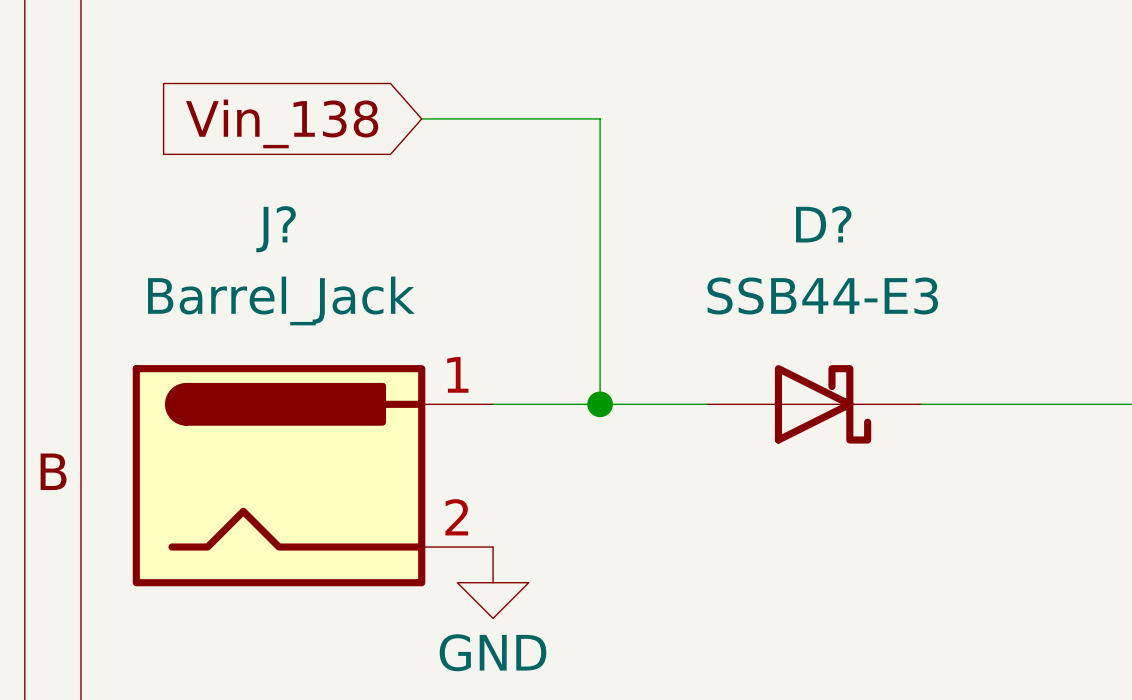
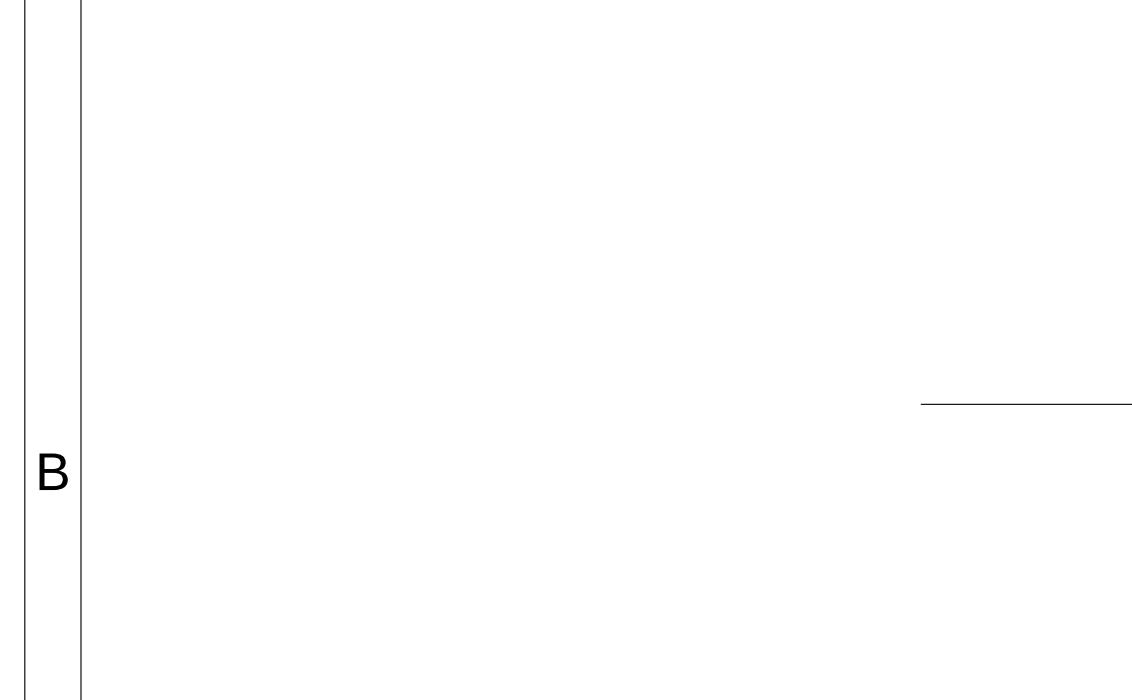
wire: (421, 118) (600, 118) (600, 404) -> none
global label: Vin_138 (282, 123) -> none
wire: (493, 404) (707, 404) -> none
junction: (600, 404) -> none
D?: SSB44-E3 (814, 404) -> none
J?: Barrel_Jack (312, 475) -> none
power symbol: GND (493, 582) -> none

